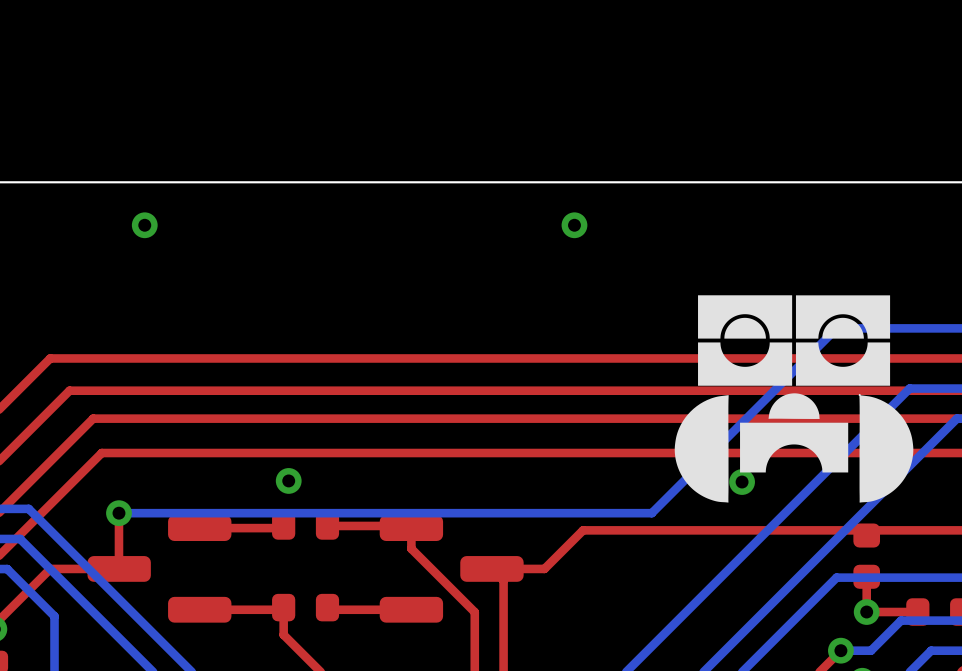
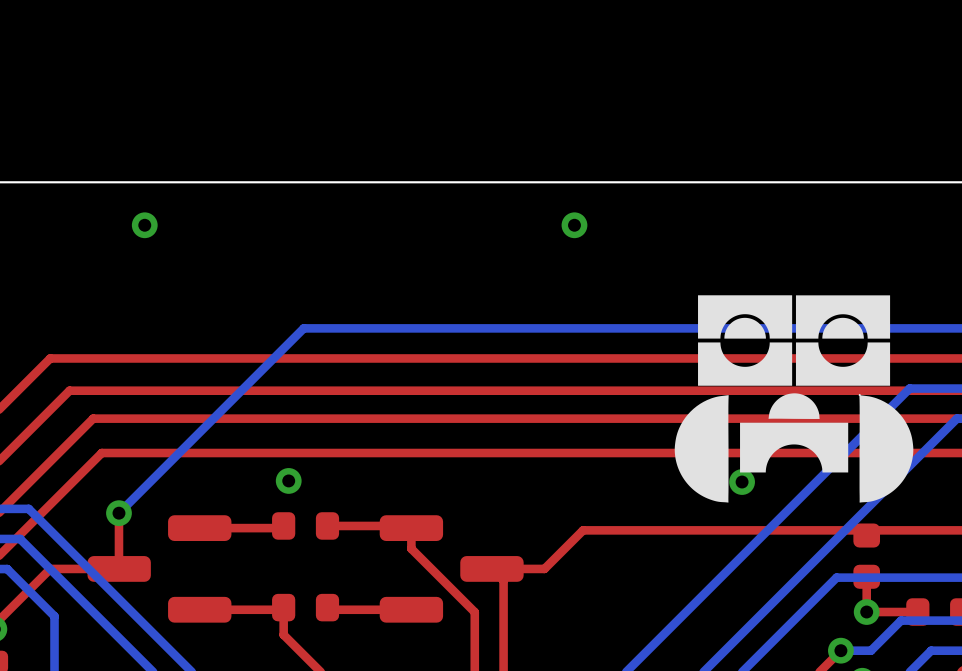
bottom track: (836, 328) (651, 513) (118, 513) -> (836, 328) (303, 328) (118, 513)

